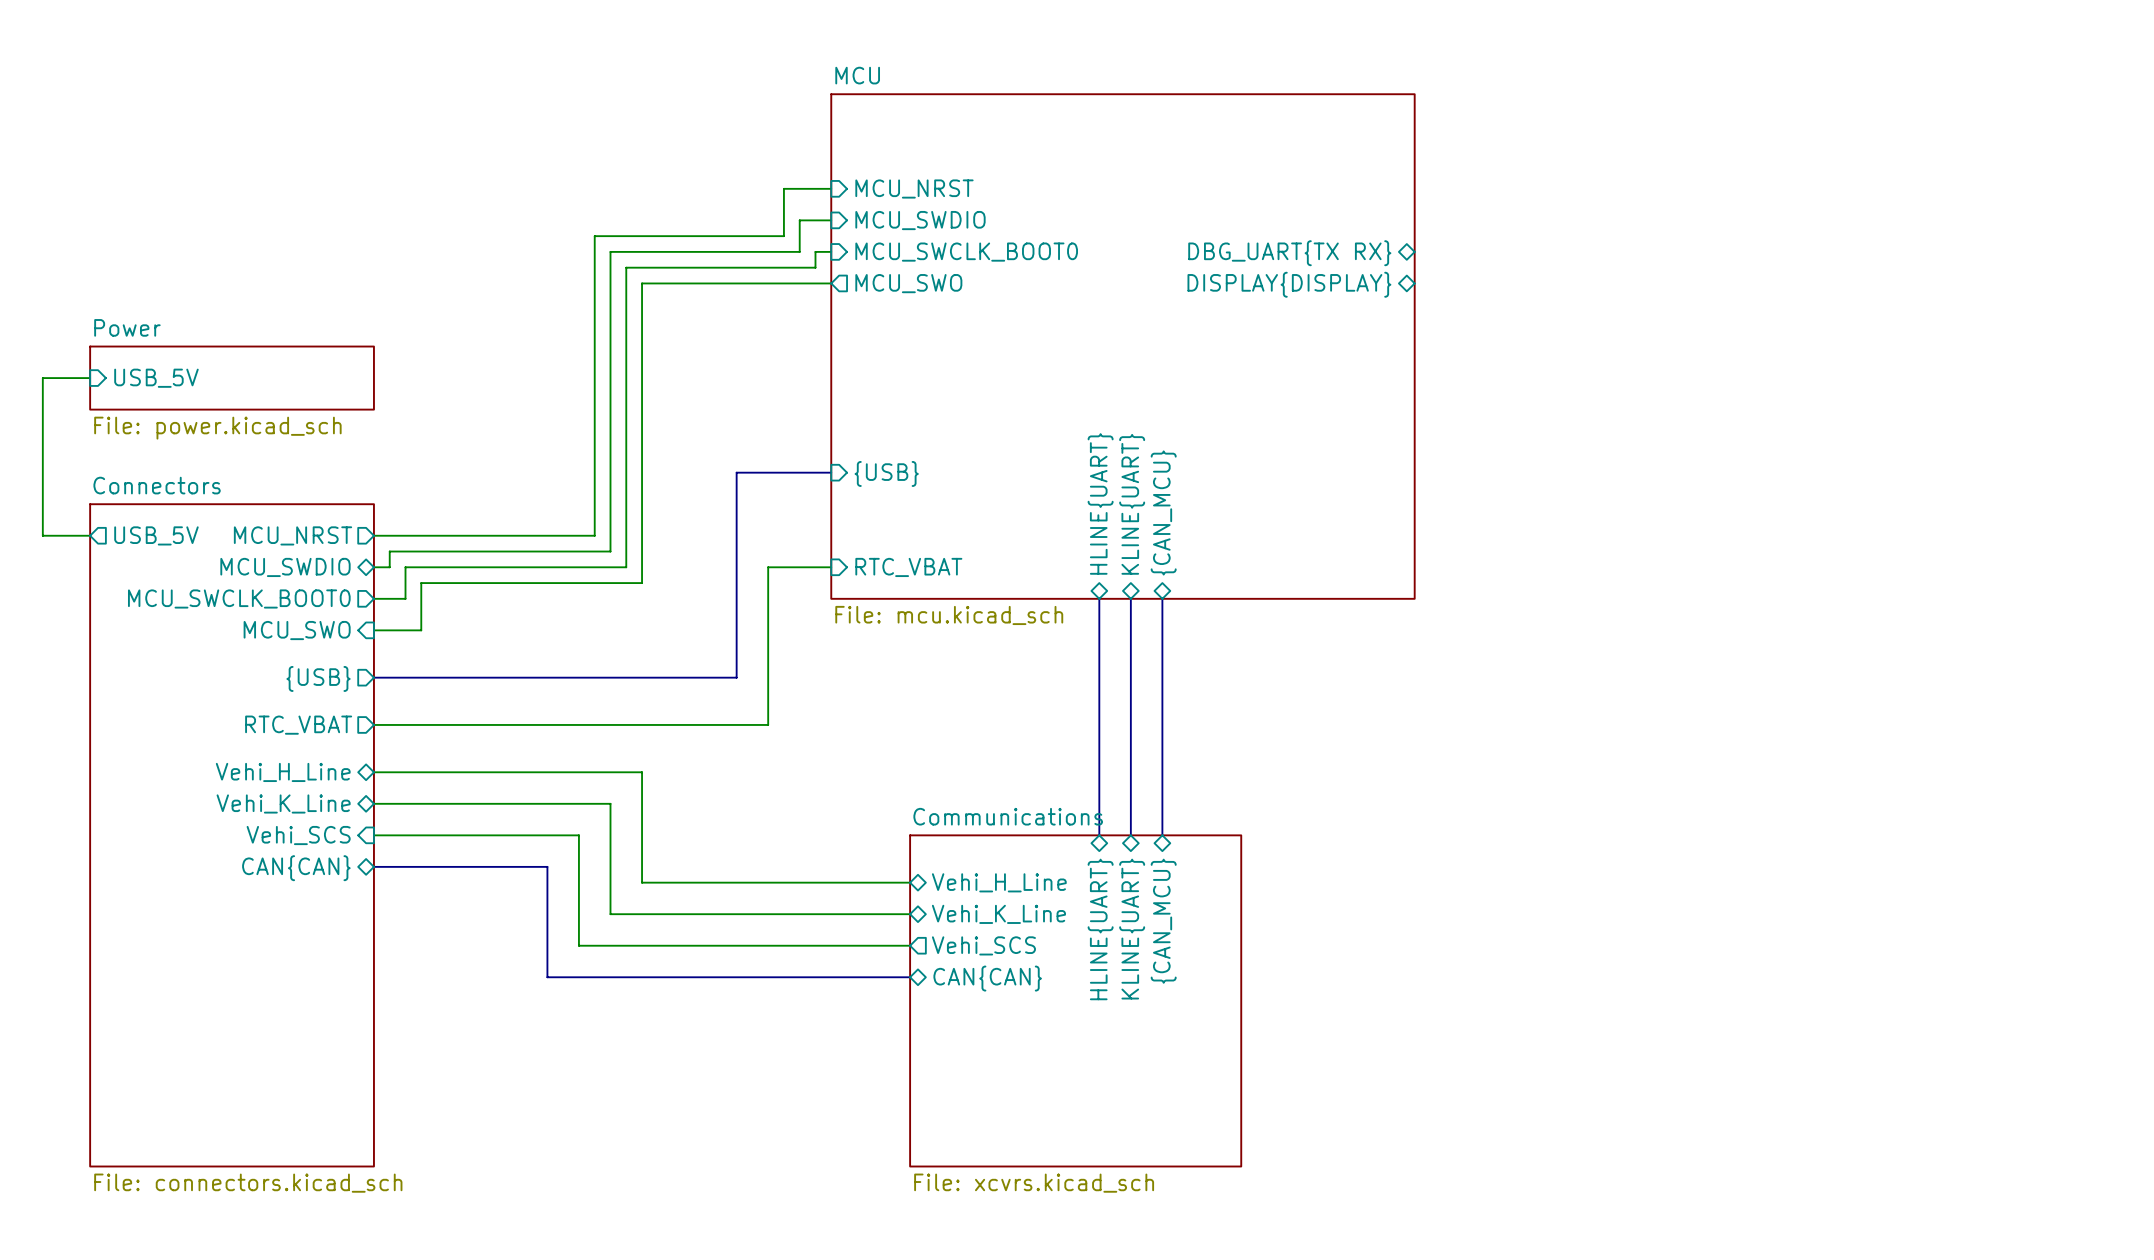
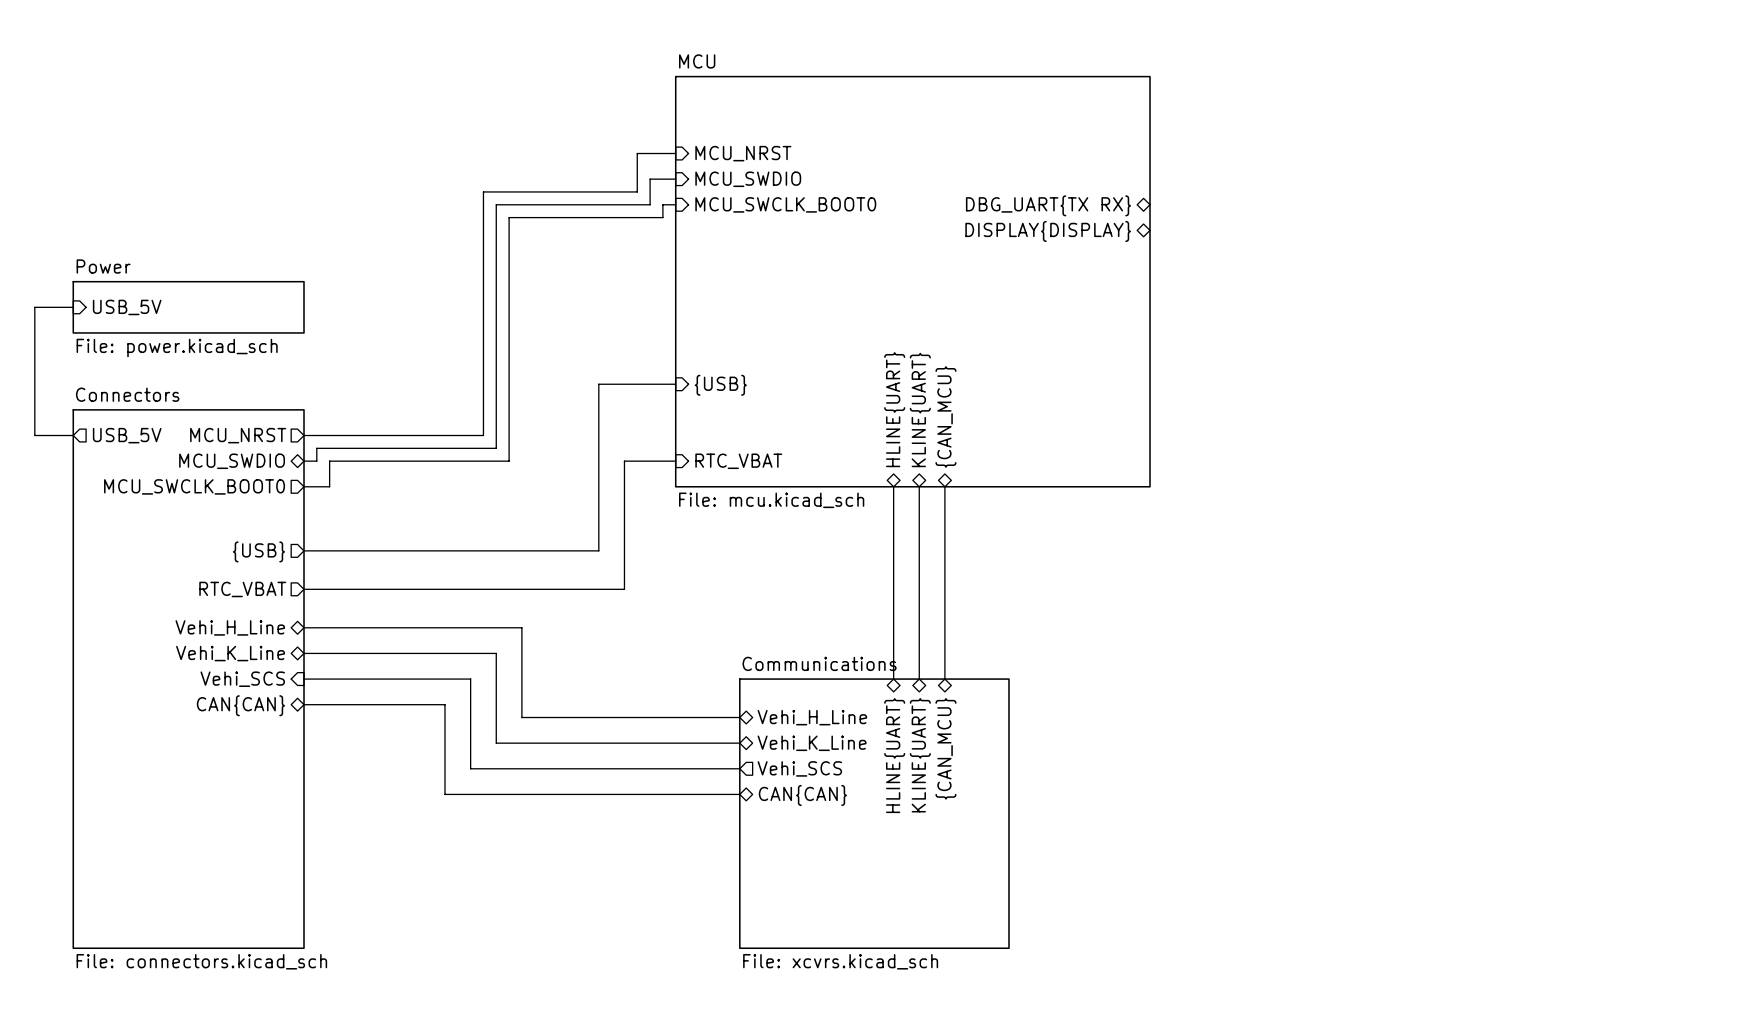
wire: (831, 283) (642, 283) (642, 583) (421, 583) (421, 630) (373, 630) -> none
sheet pin: MCU_SWO (908, 283) -> none
sheet pin: MCU_SWO (297, 630) -> none

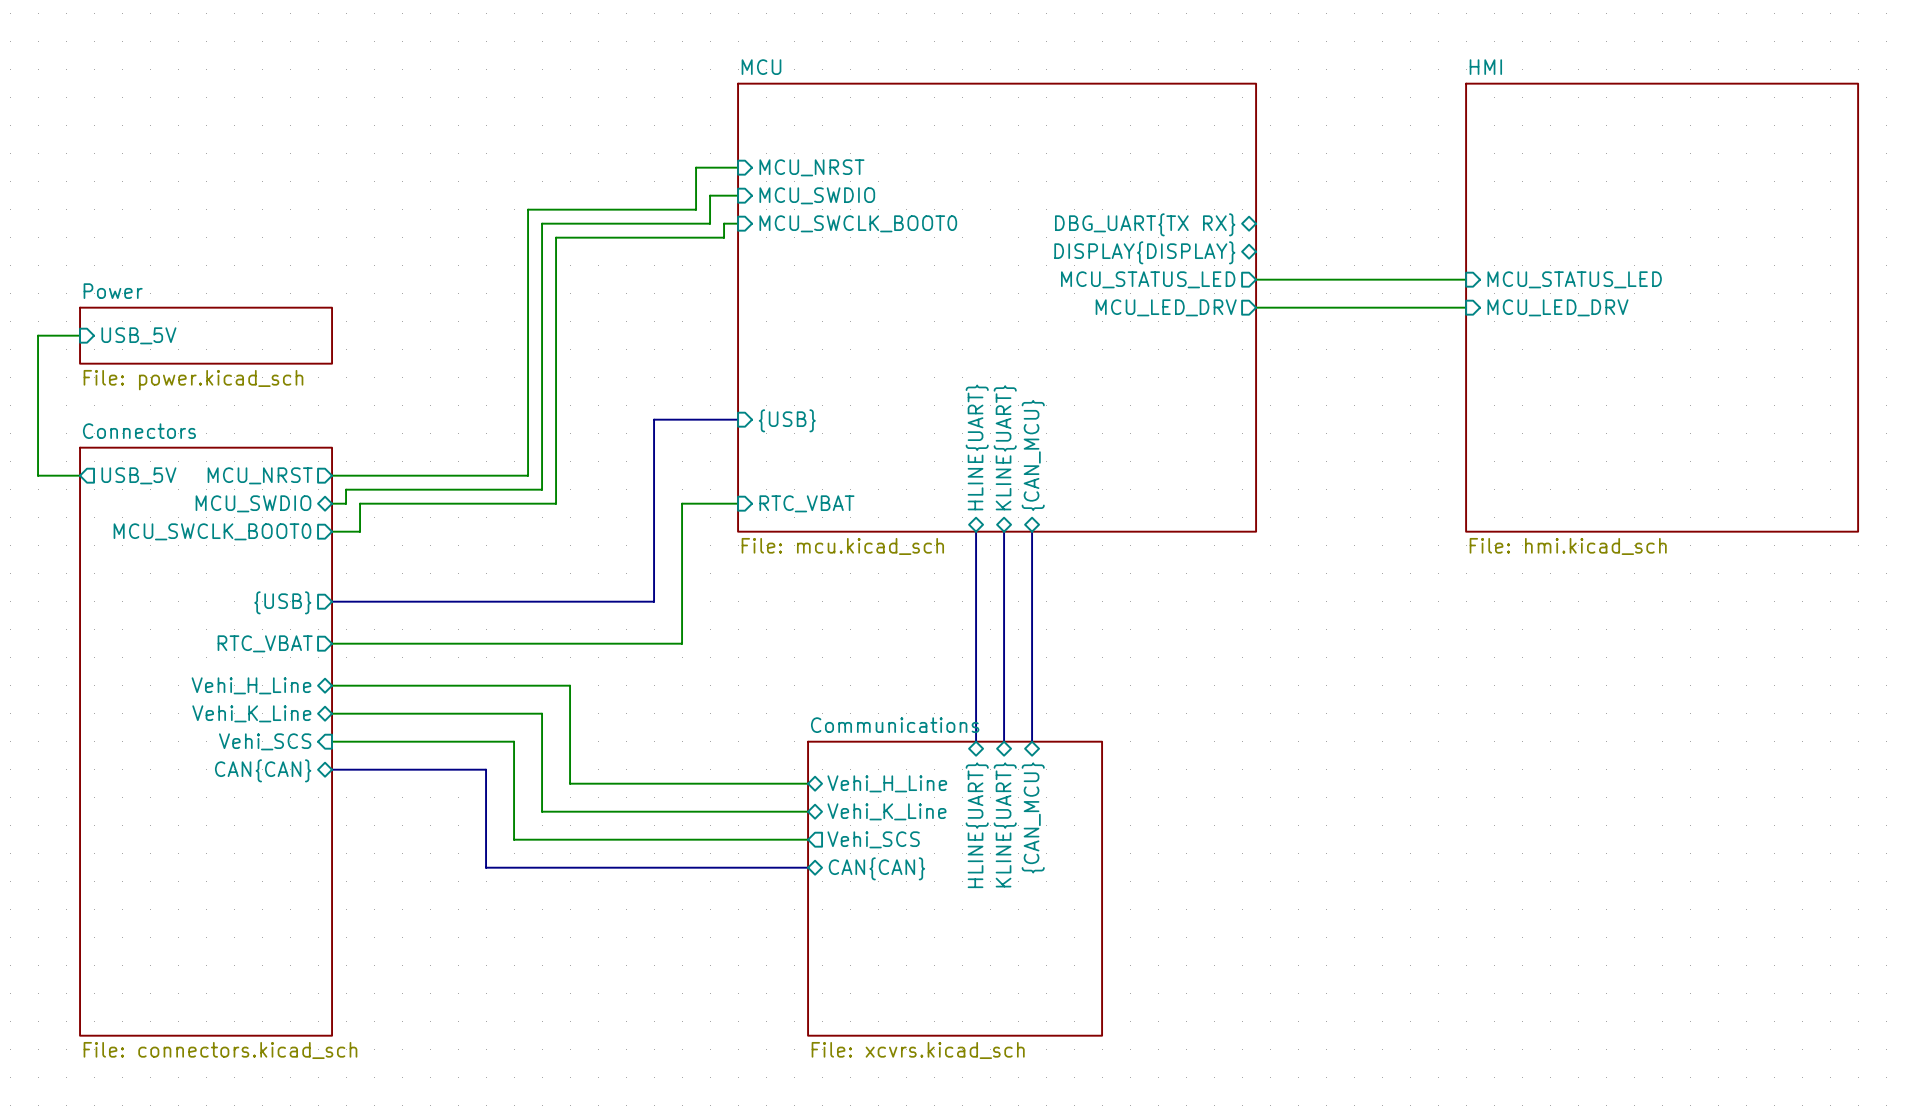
sheet pin: none -> MCU_STATUS_LED (1148, 279)
wire: none -> (1256, 279) (1466, 279)
sheet pin: none -> MCU_STATUS_LED (1574, 279)
sheet pin: none -> MCU_LED_DRV (1166, 307)
wire: none -> (1256, 307) (1466, 307)
sheet pin: none -> MCU_LED_DRV (1557, 307)
sheet HMI: none -> File: hmi.kicad_sch (1662, 307)

